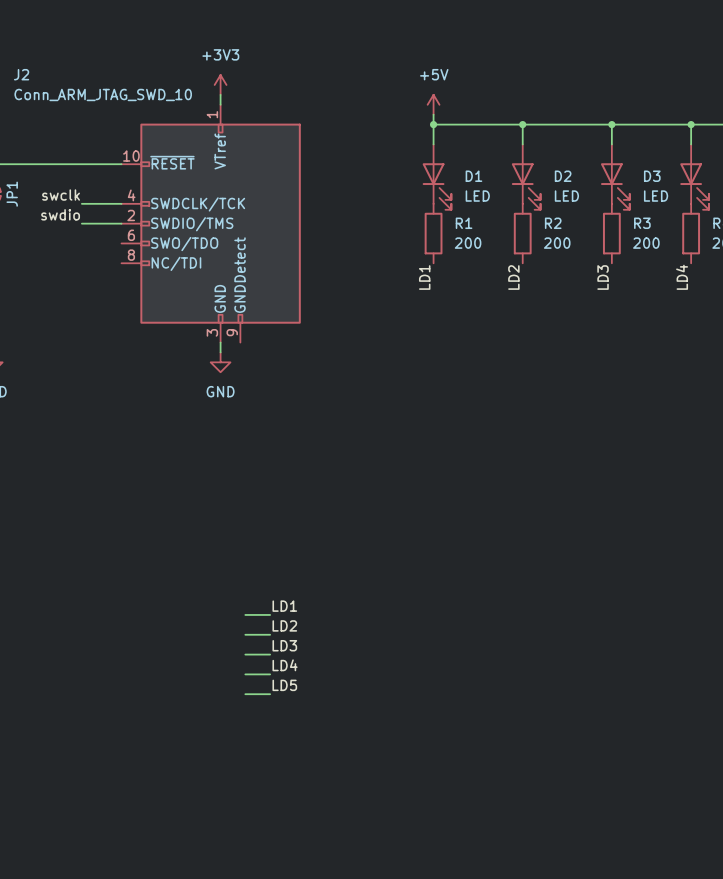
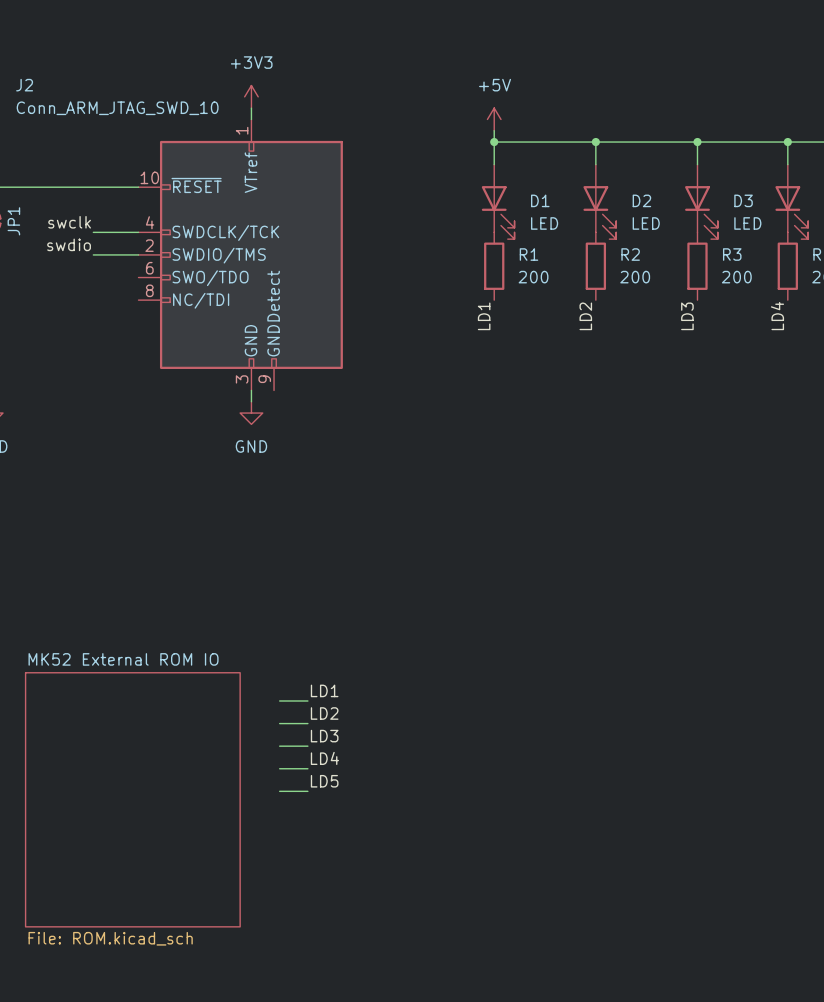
sheet MK52 External ROM IO: none -> File: ROM.kicad_sch (132, 799)

